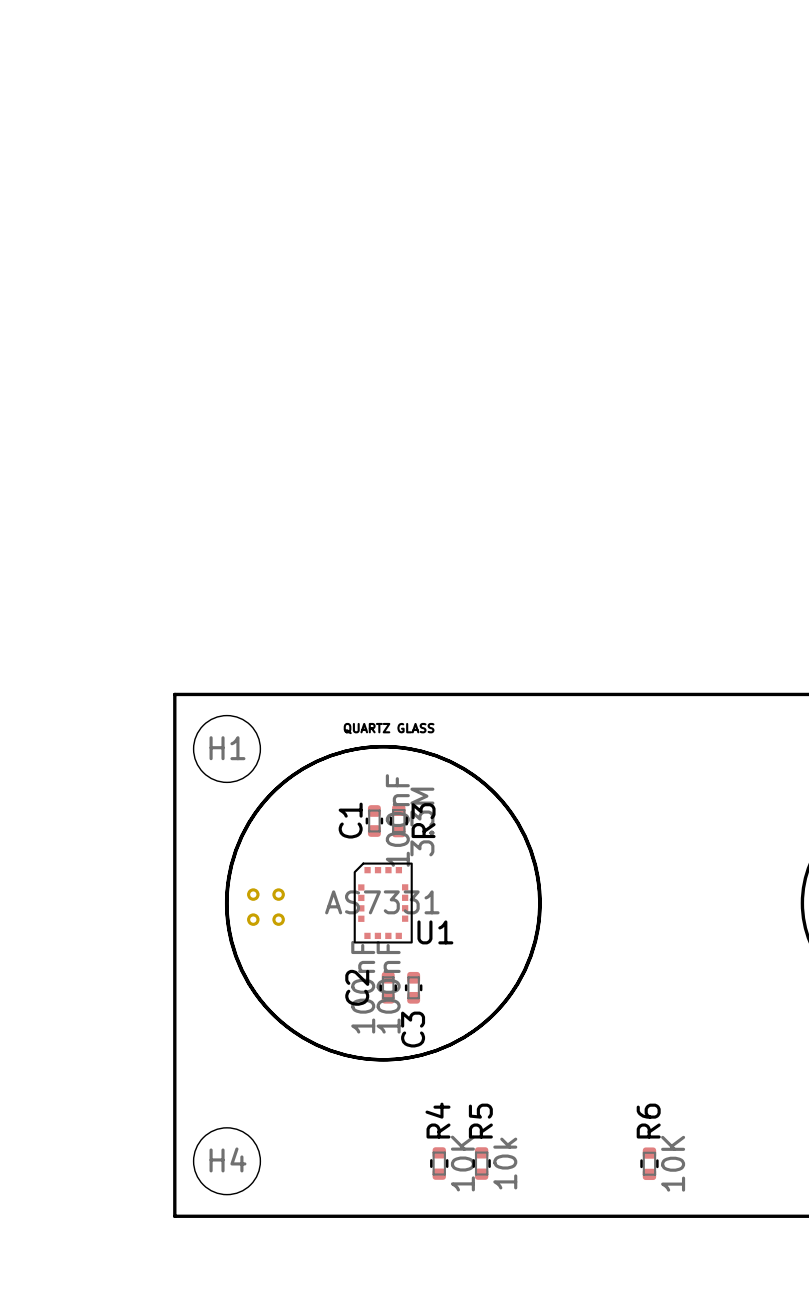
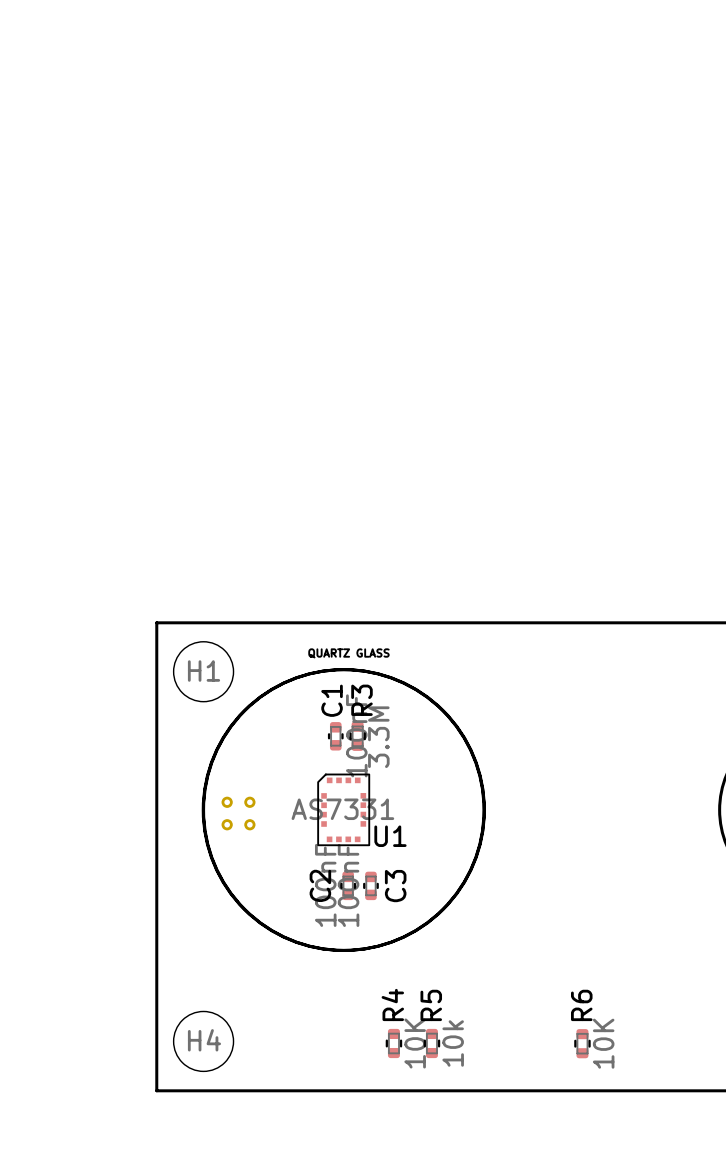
C1 name position: C1 (350, 820) -> C1 (332, 700)
R3 name position: R3 (423, 820) -> R3 (361, 700)
C3 name position: C3 (413, 1029) -> C3 (395, 886)

